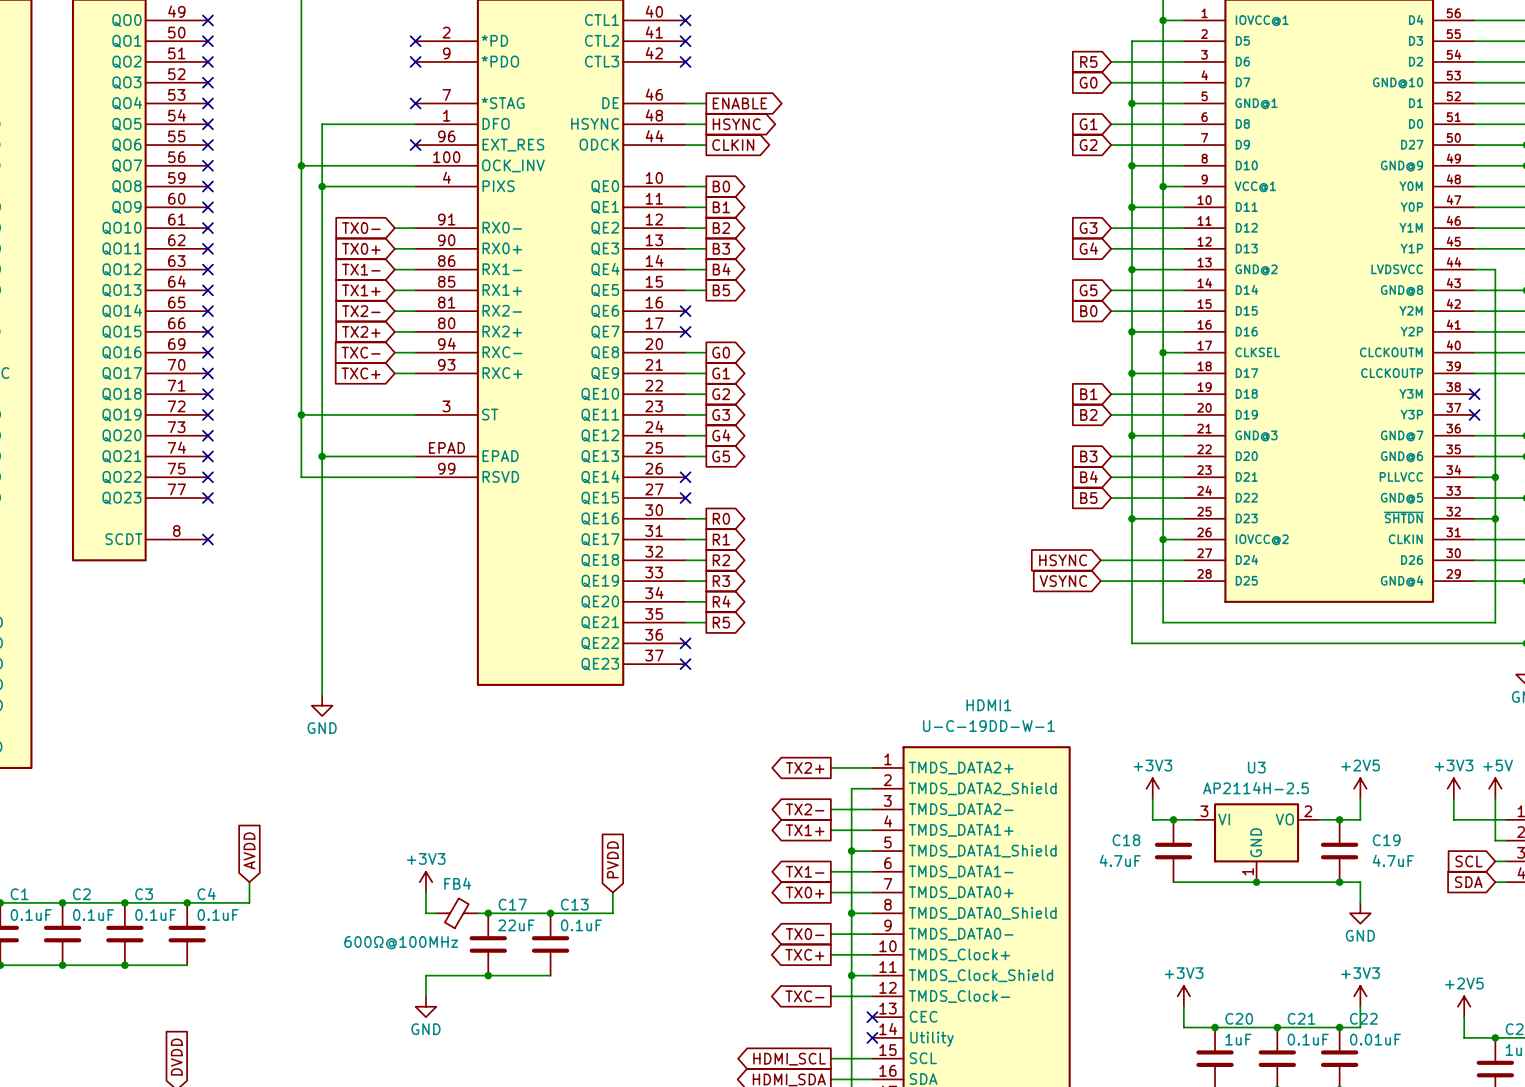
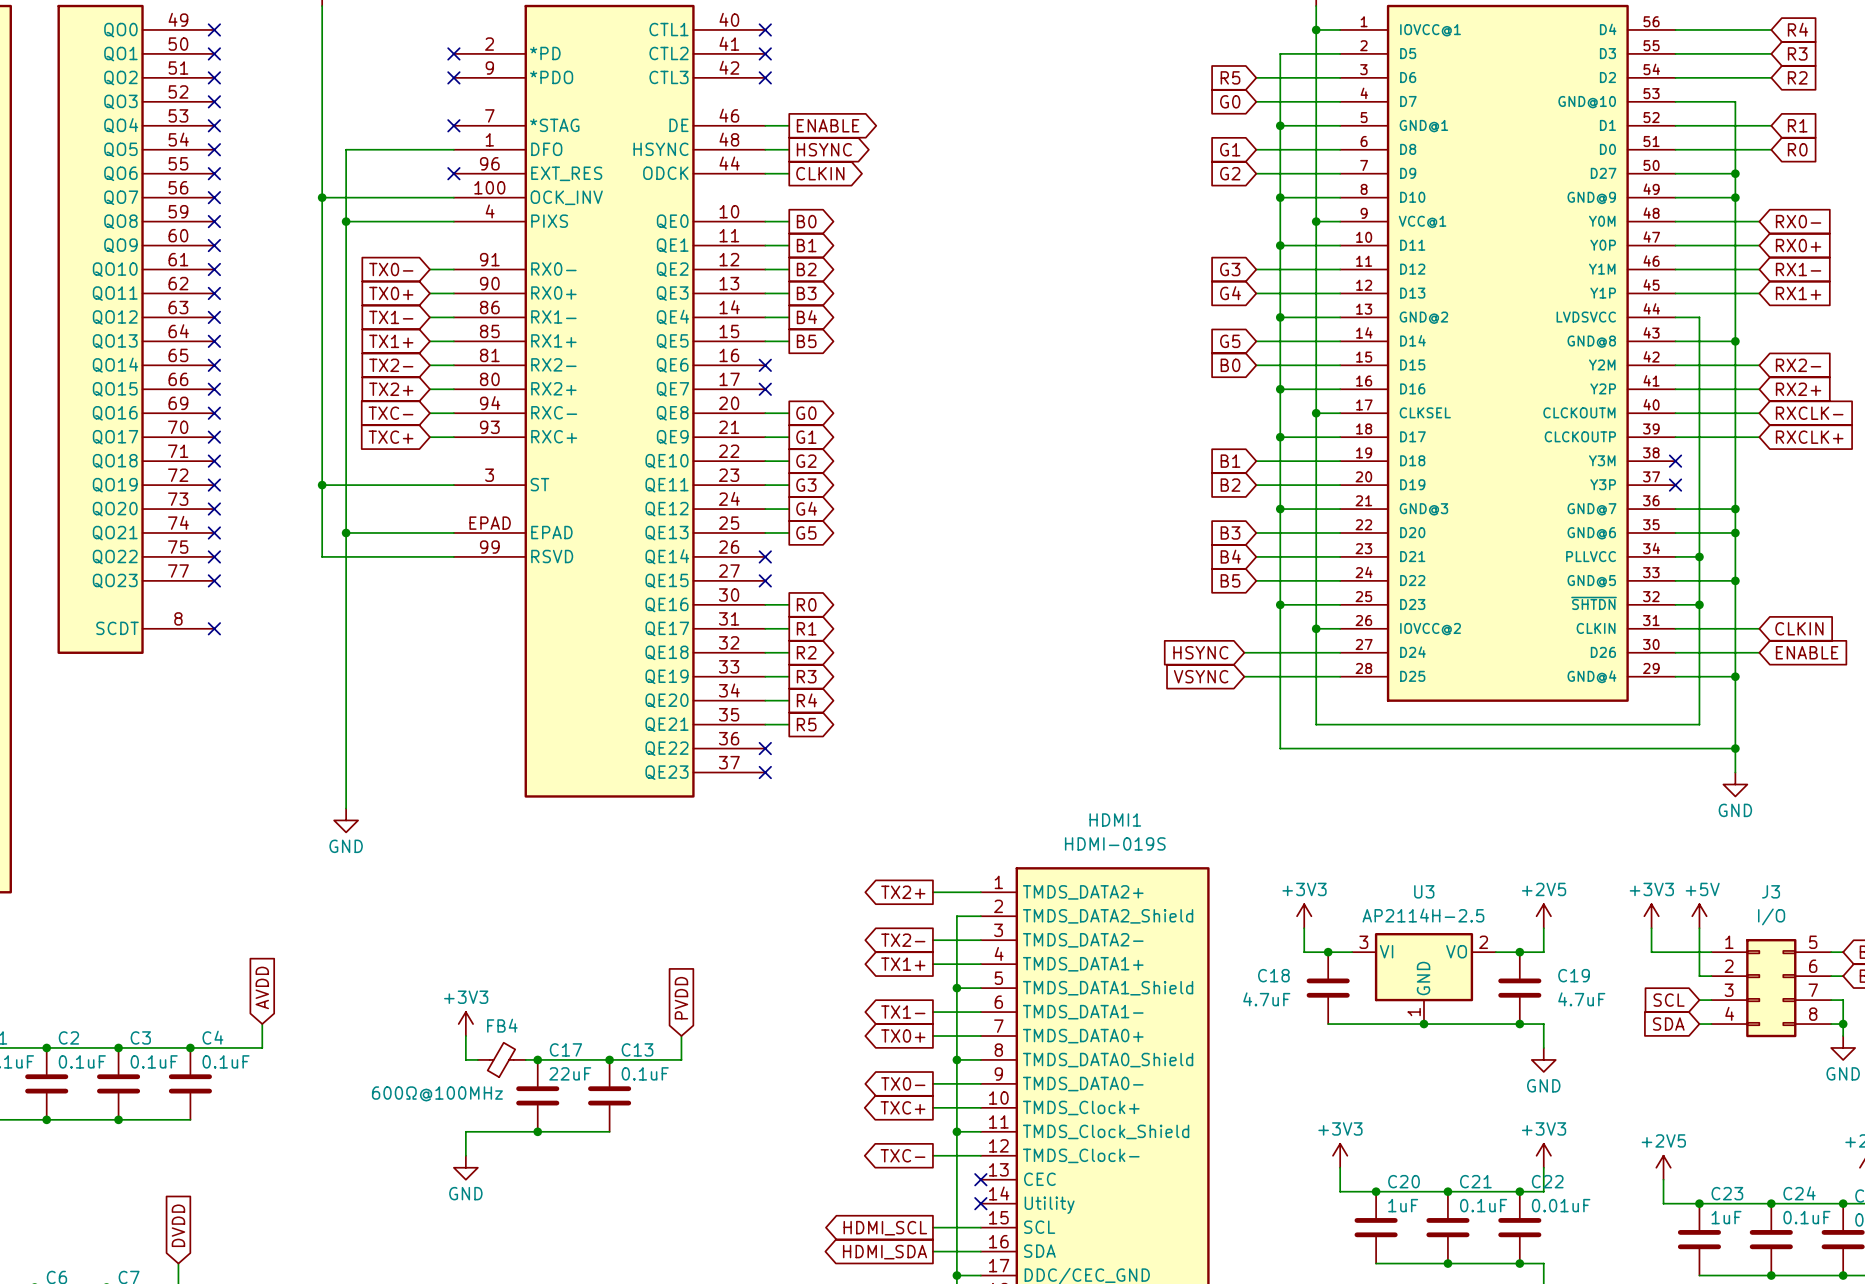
HDMI1 value: U-C-19DD-W-1 (988, 726) -> HDMI-019S (1115, 843)

